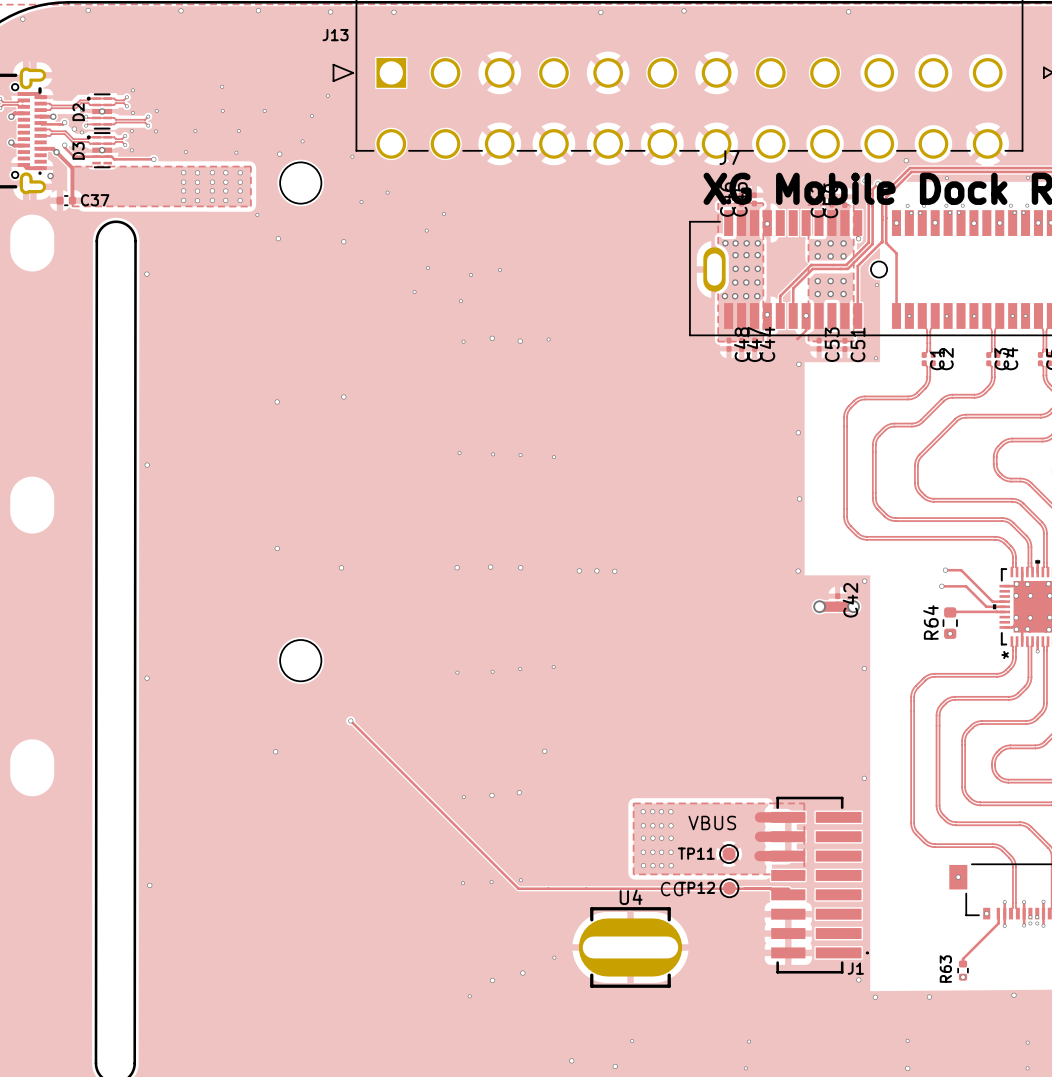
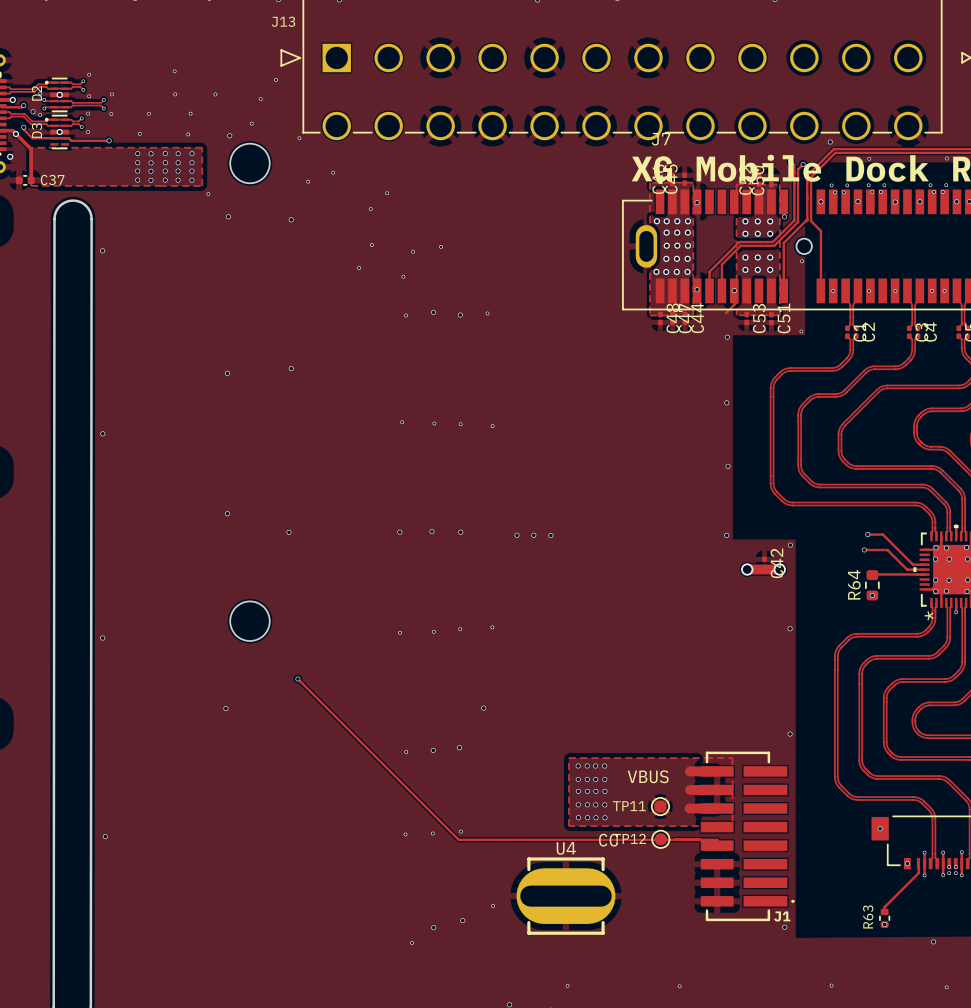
via: (875, 997) -> none
via: (929, 997) -> none

